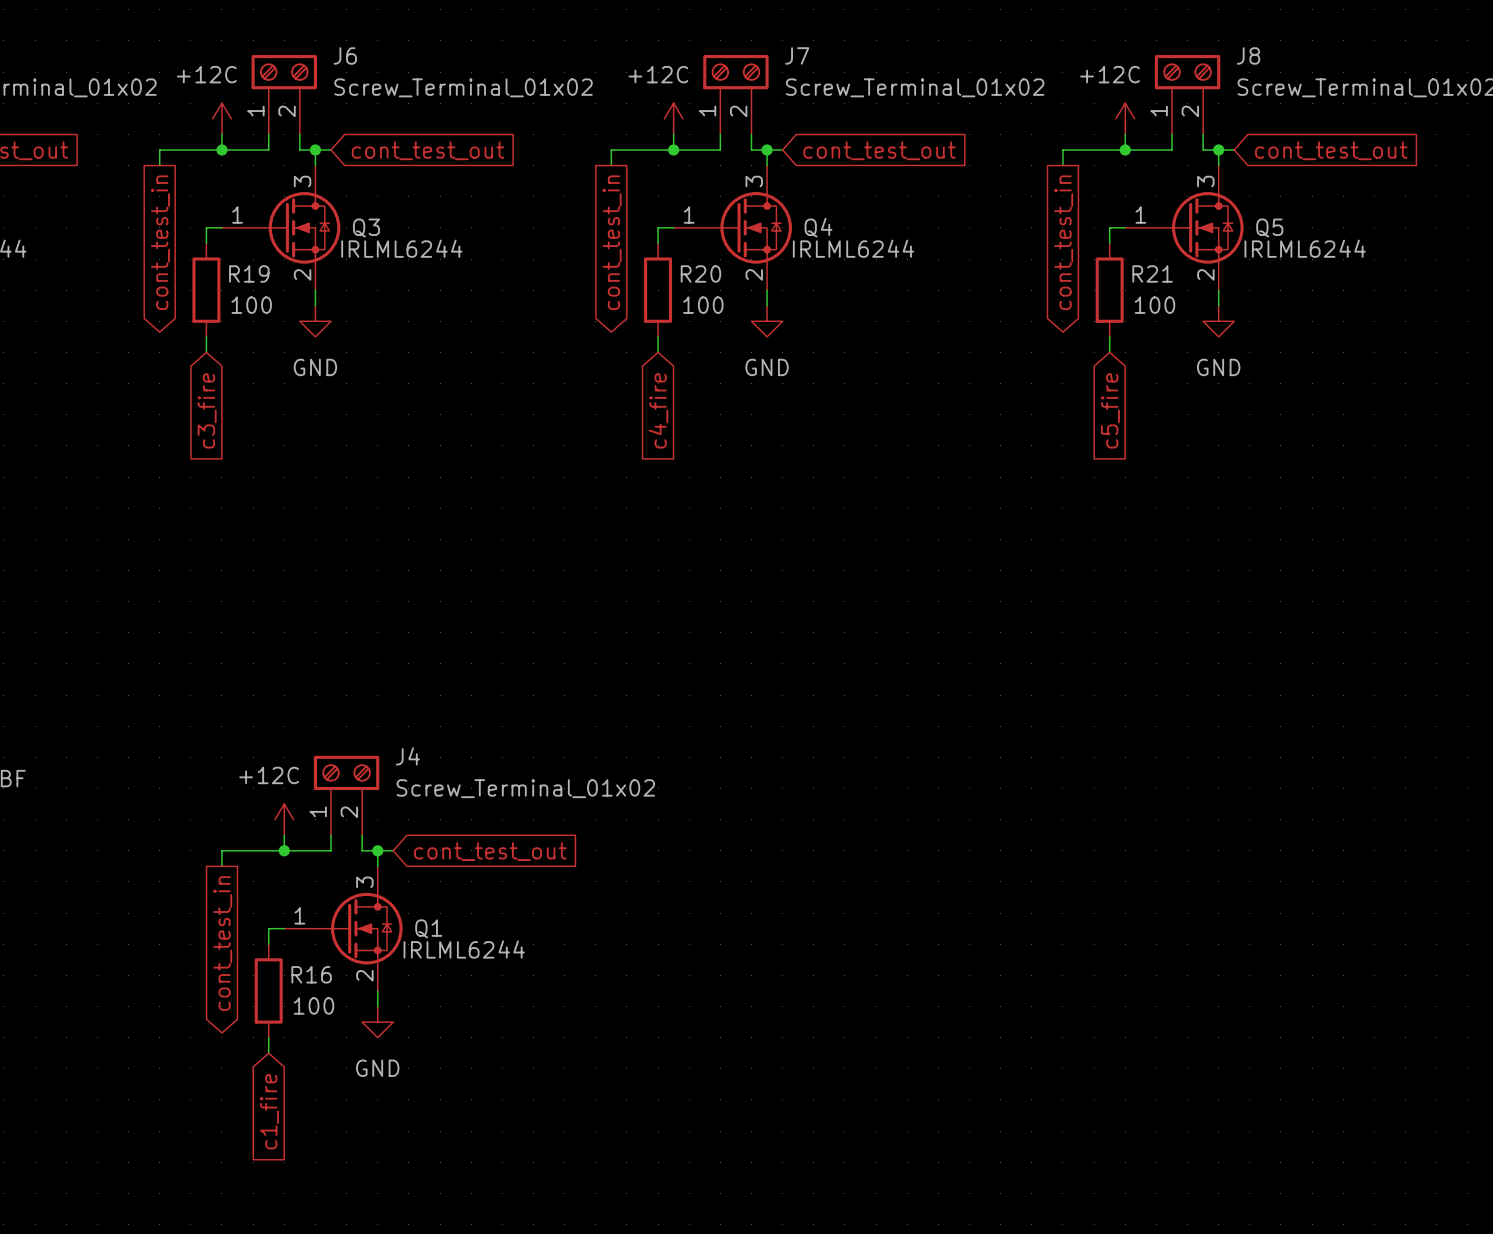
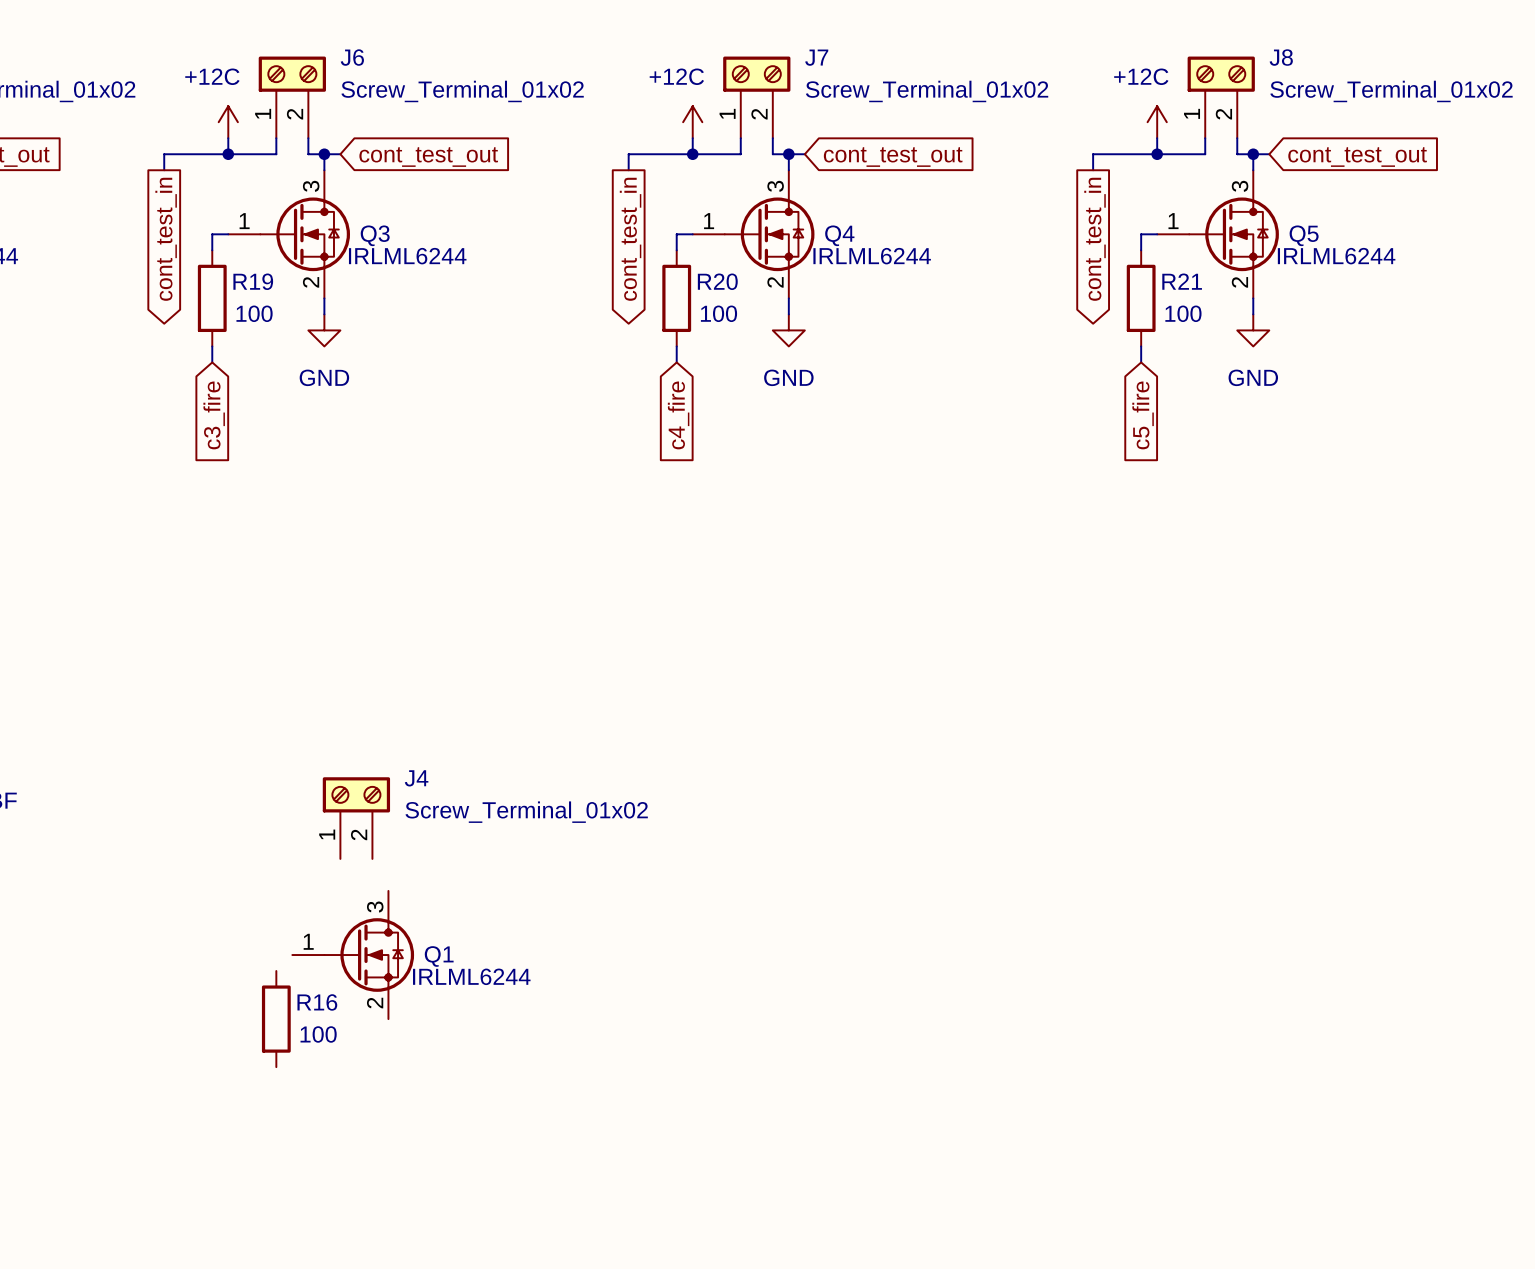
power symbol: +12C (284, 819) -> none
wire: (284, 835) (284, 850) -> none
wire: (331, 835) (331, 850) (221, 850) (221, 866) -> none
wire: (362, 835) (362, 850) (393, 850) -> none
junction: (284, 850) -> none
wire: (377, 850) (377, 866) -> none
junction: (377, 850) -> none
global label: cont_test_out (490, 851) -> none
wire: (284, 928) (268, 928) (268, 944) -> none
global label: cont_test_in (222, 943) -> none
wire: (377, 990) (377, 1006) -> none
power symbol: GND (377, 1022) -> none
wire: (268, 1037) (268, 1053) -> none
global label: c1_fire (269, 1111) -> none

